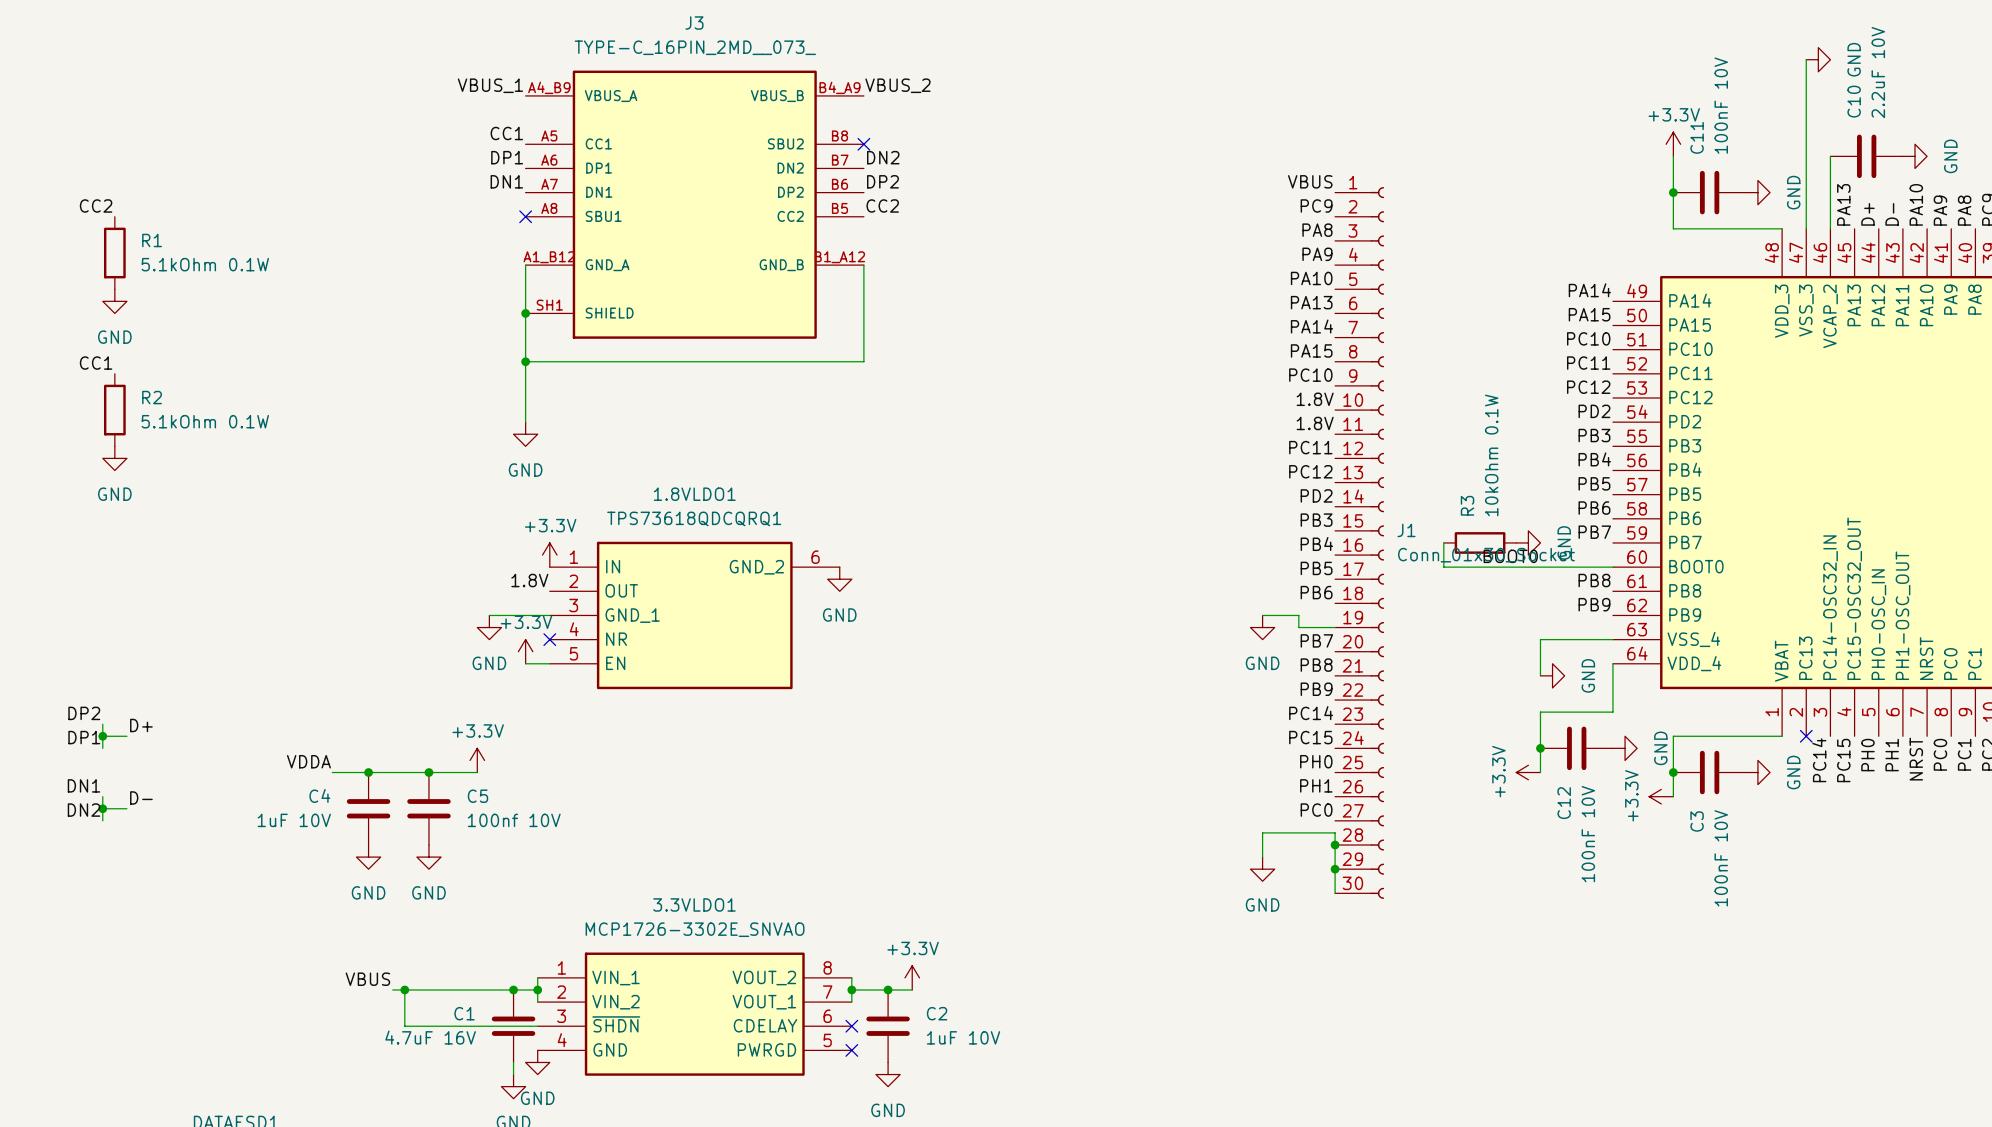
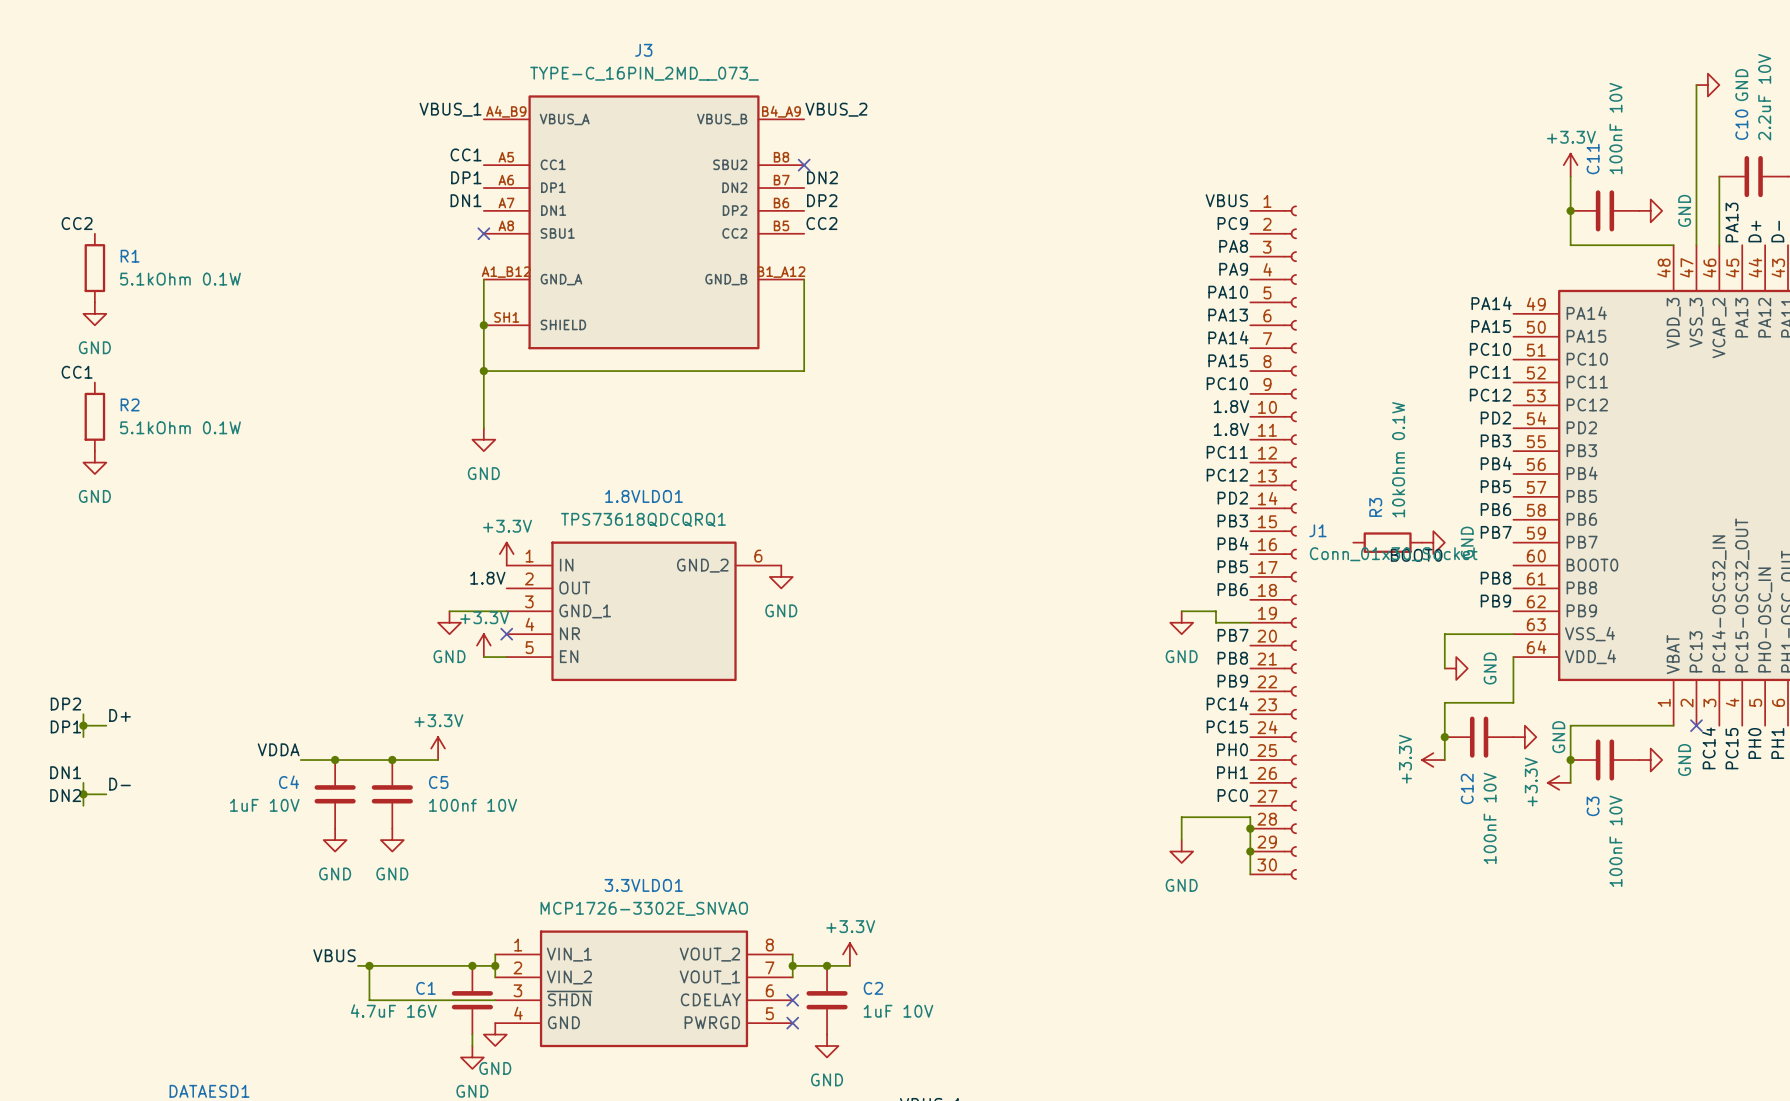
wire: (1443, 542) (1443, 567) (1612, 567) -> none

